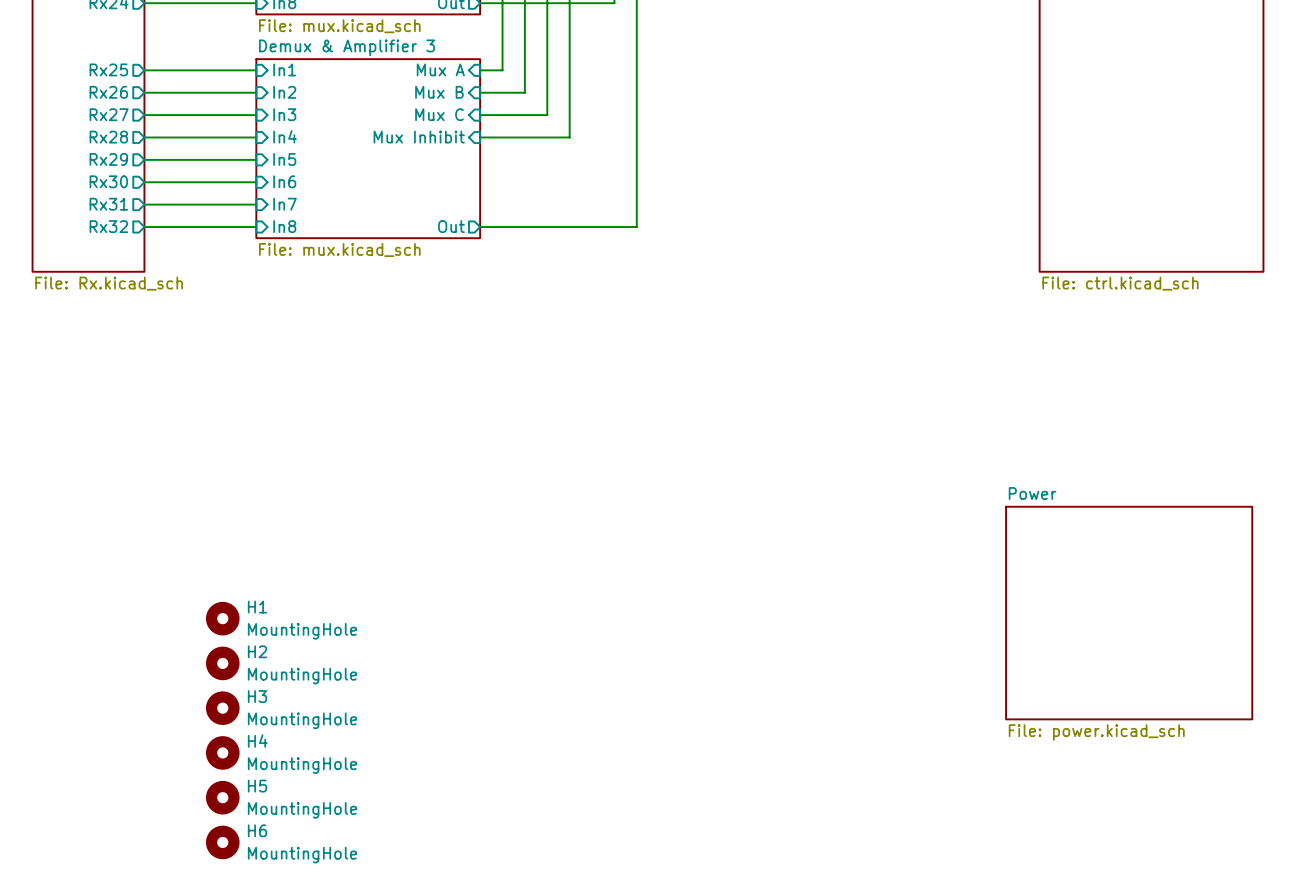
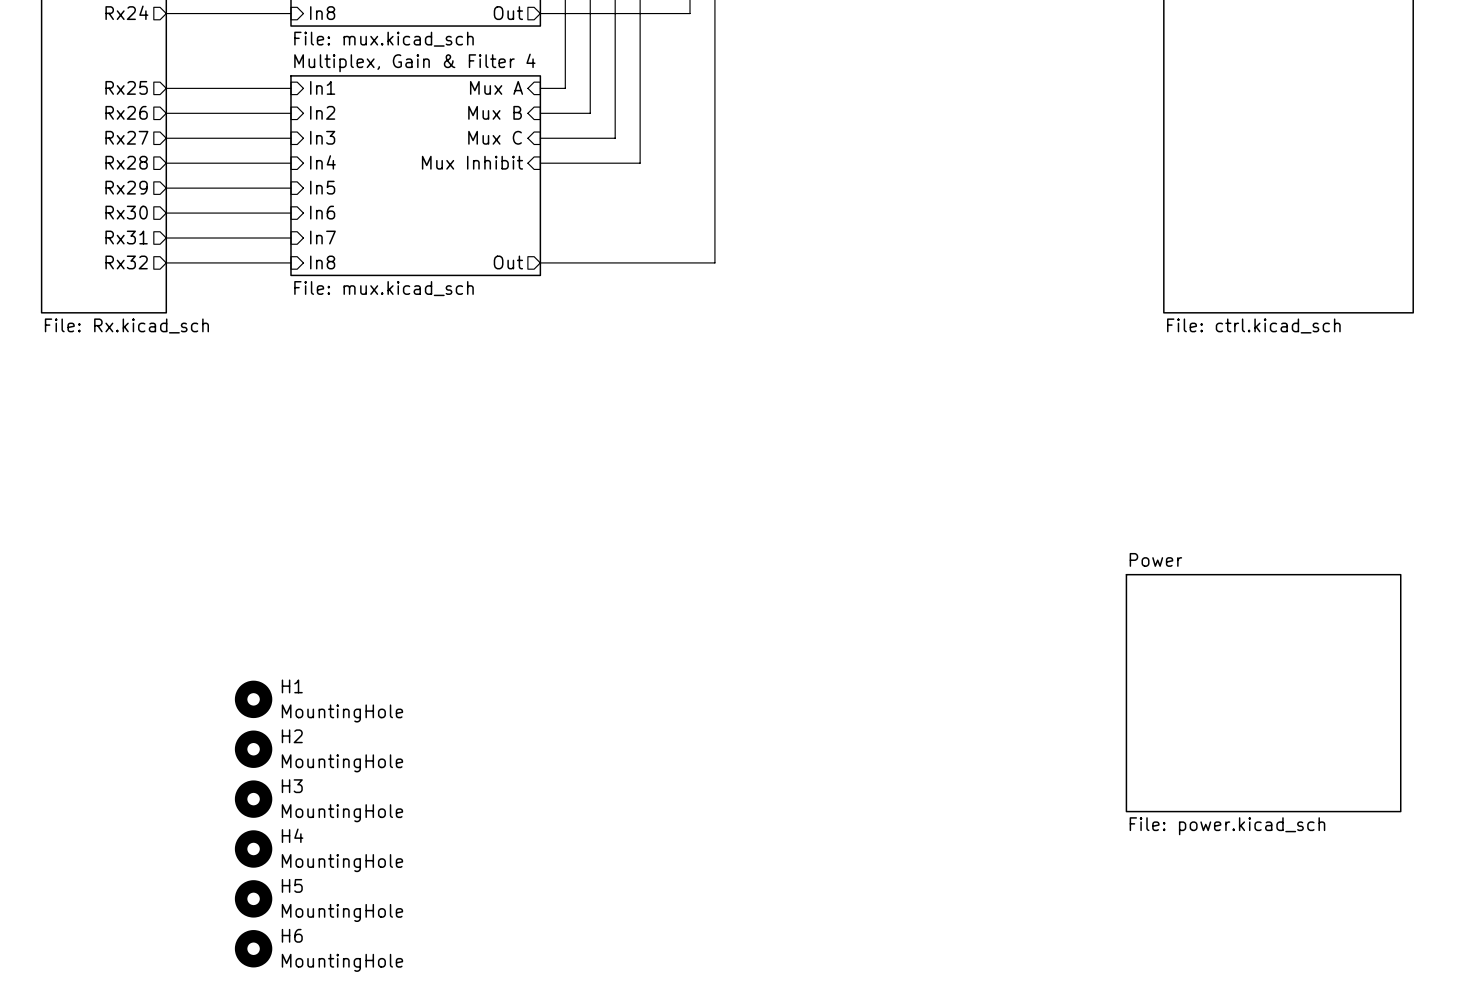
sheet Demux & Amplifier 3 name: Demux & Amplifier 3 (347, 47) -> Multiplex, Gain & Filter 4 (414, 62)

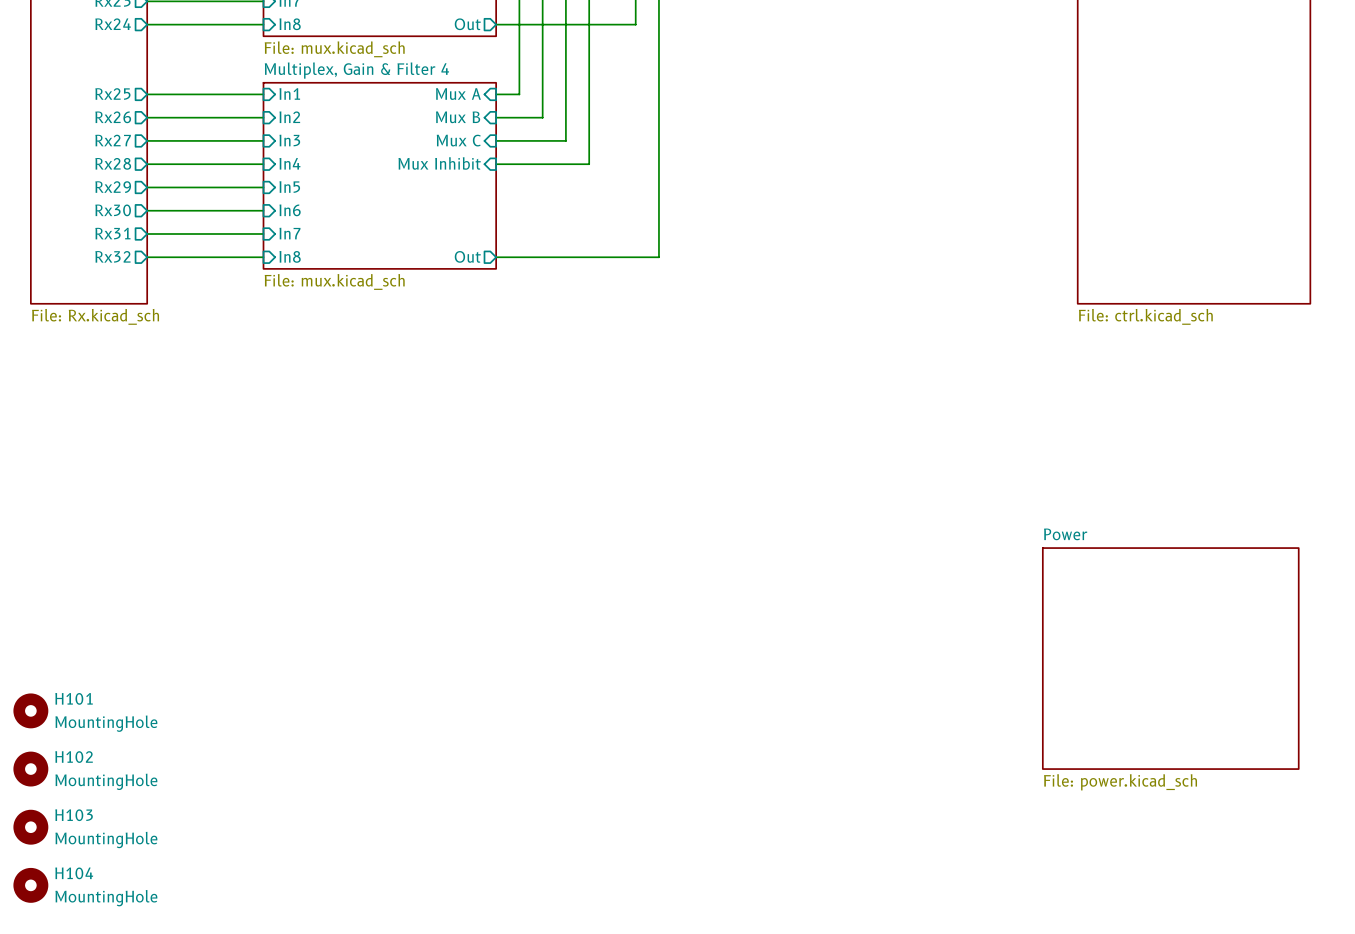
H1: MountingHole (253, 699) -> none
H101: none -> MountingHole (30, 710)
H2: MountingHole (253, 749) -> none
H3: MountingHole (253, 799) -> none
H102: none -> MountingHole (30, 769)
H4: MountingHole (253, 848) -> none
H103: none -> MountingHole (30, 827)
H5: MountingHole (253, 898) -> none
H104: none -> MountingHole (30, 885)
H6: MountingHole (253, 948) -> none

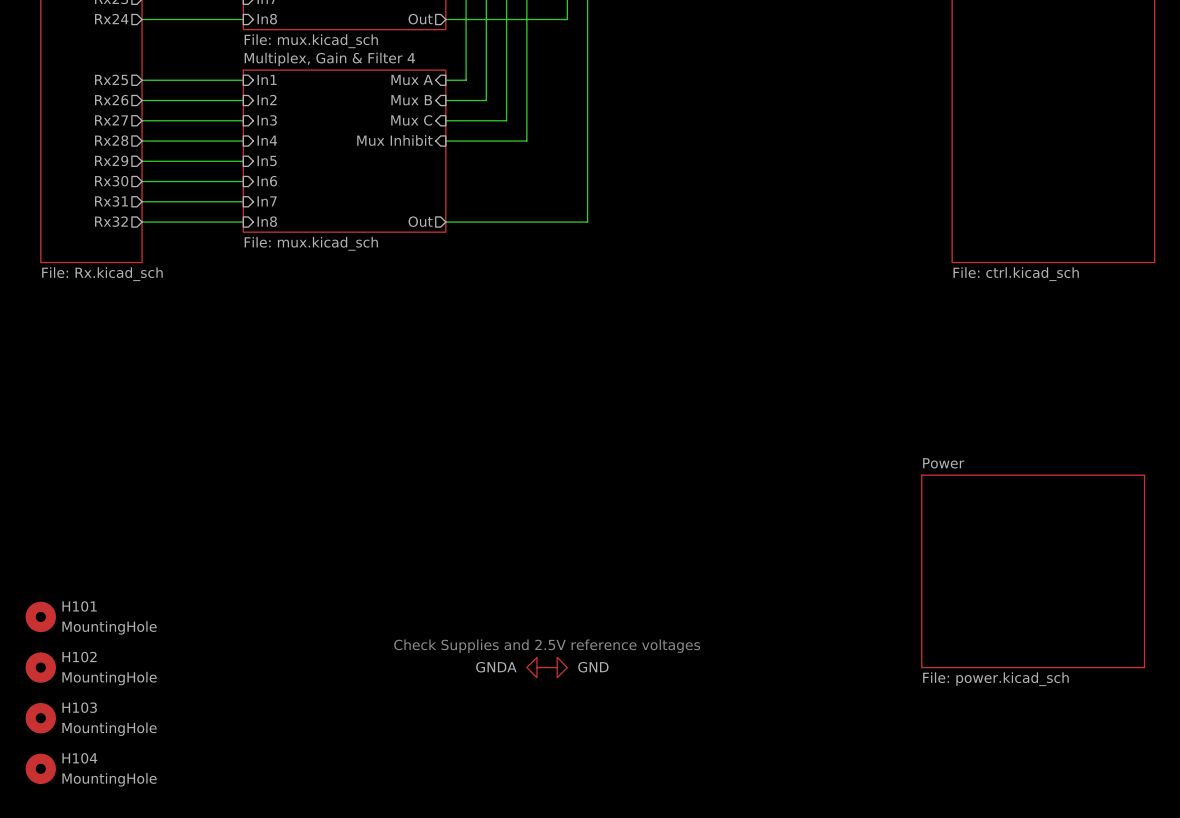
text: none -> Check Supplies and 2.5V reference voltages (547, 646)
power symbol: none -> GNDA (536, 667)
power symbol: none -> GND (557, 667)

